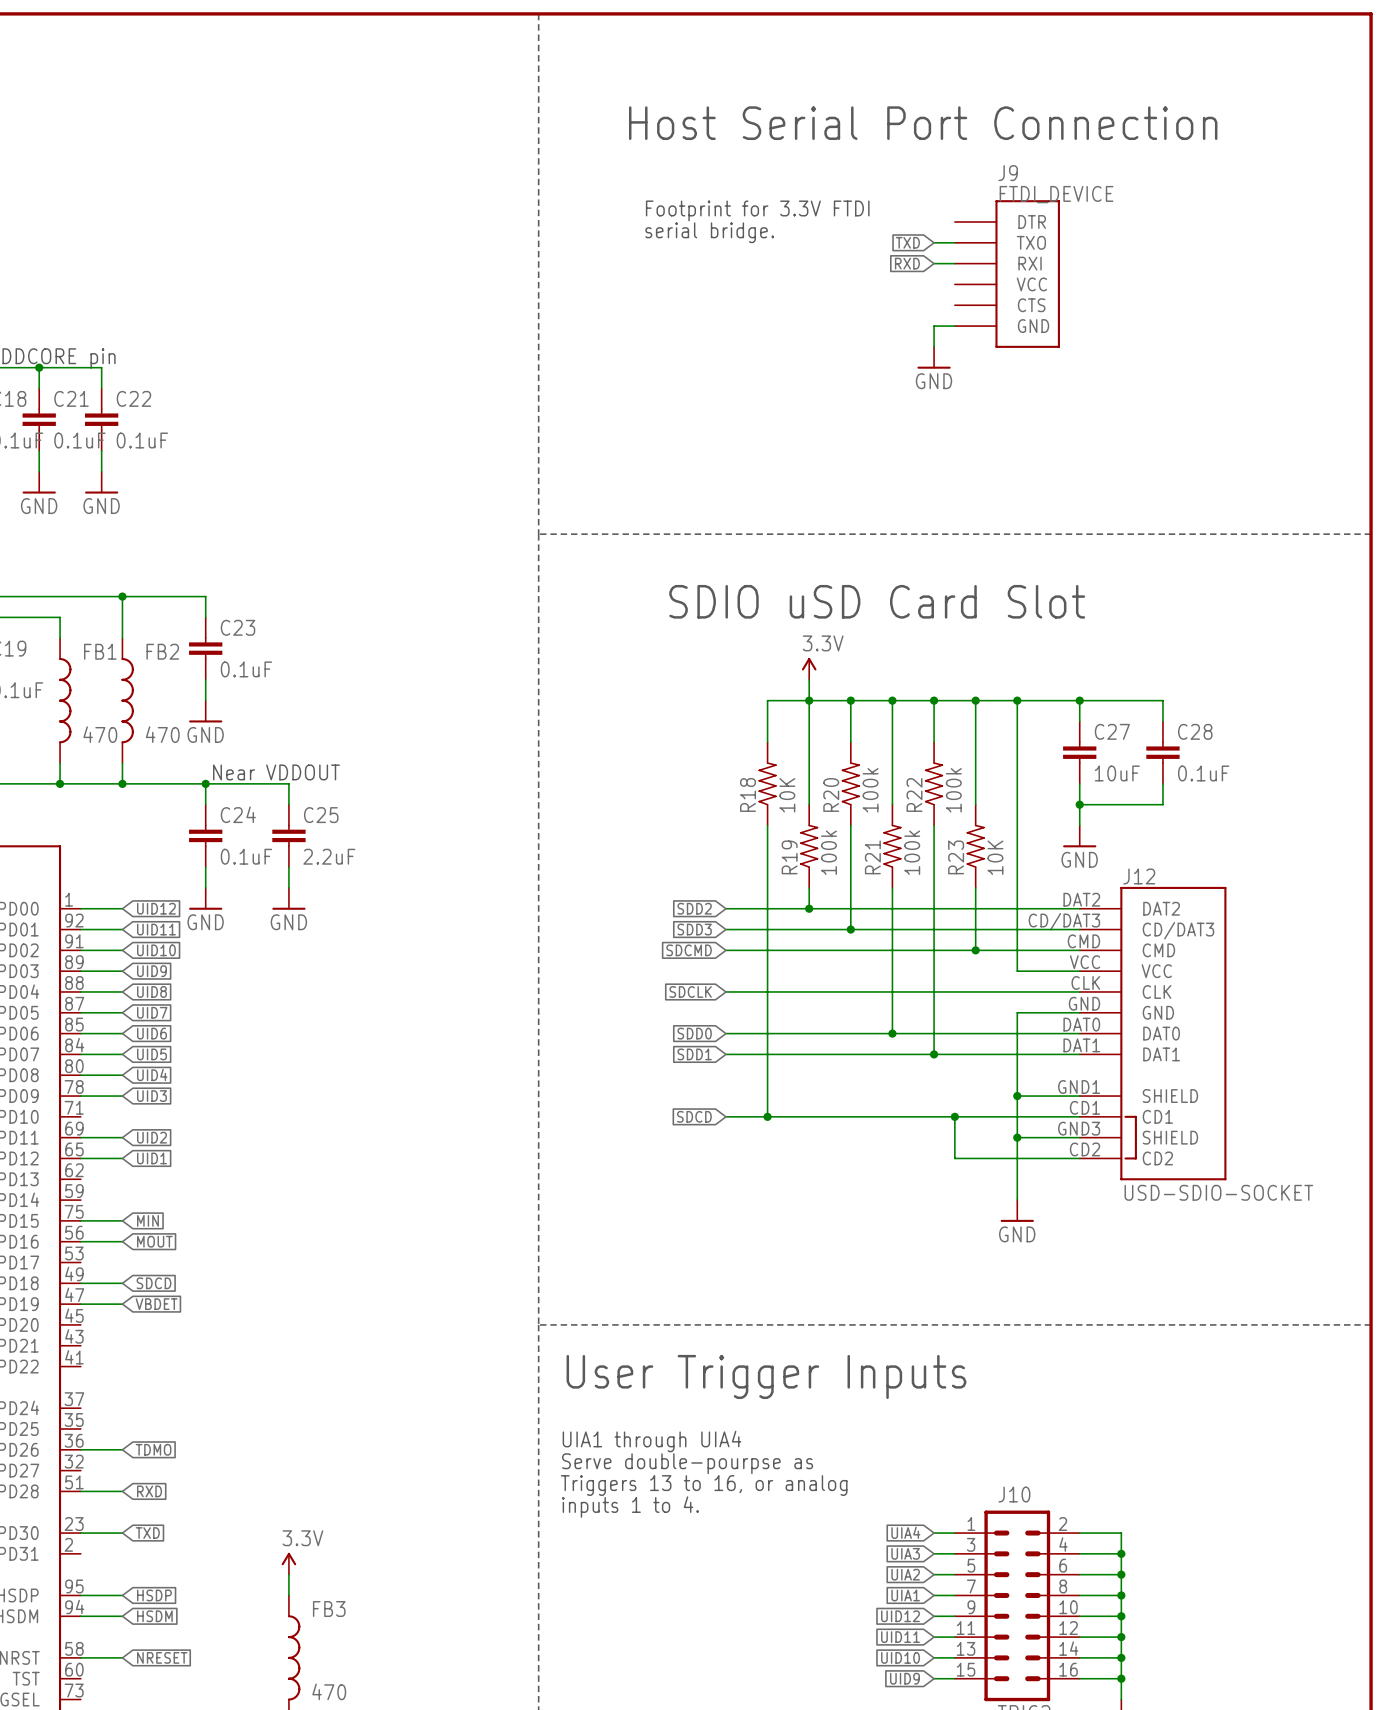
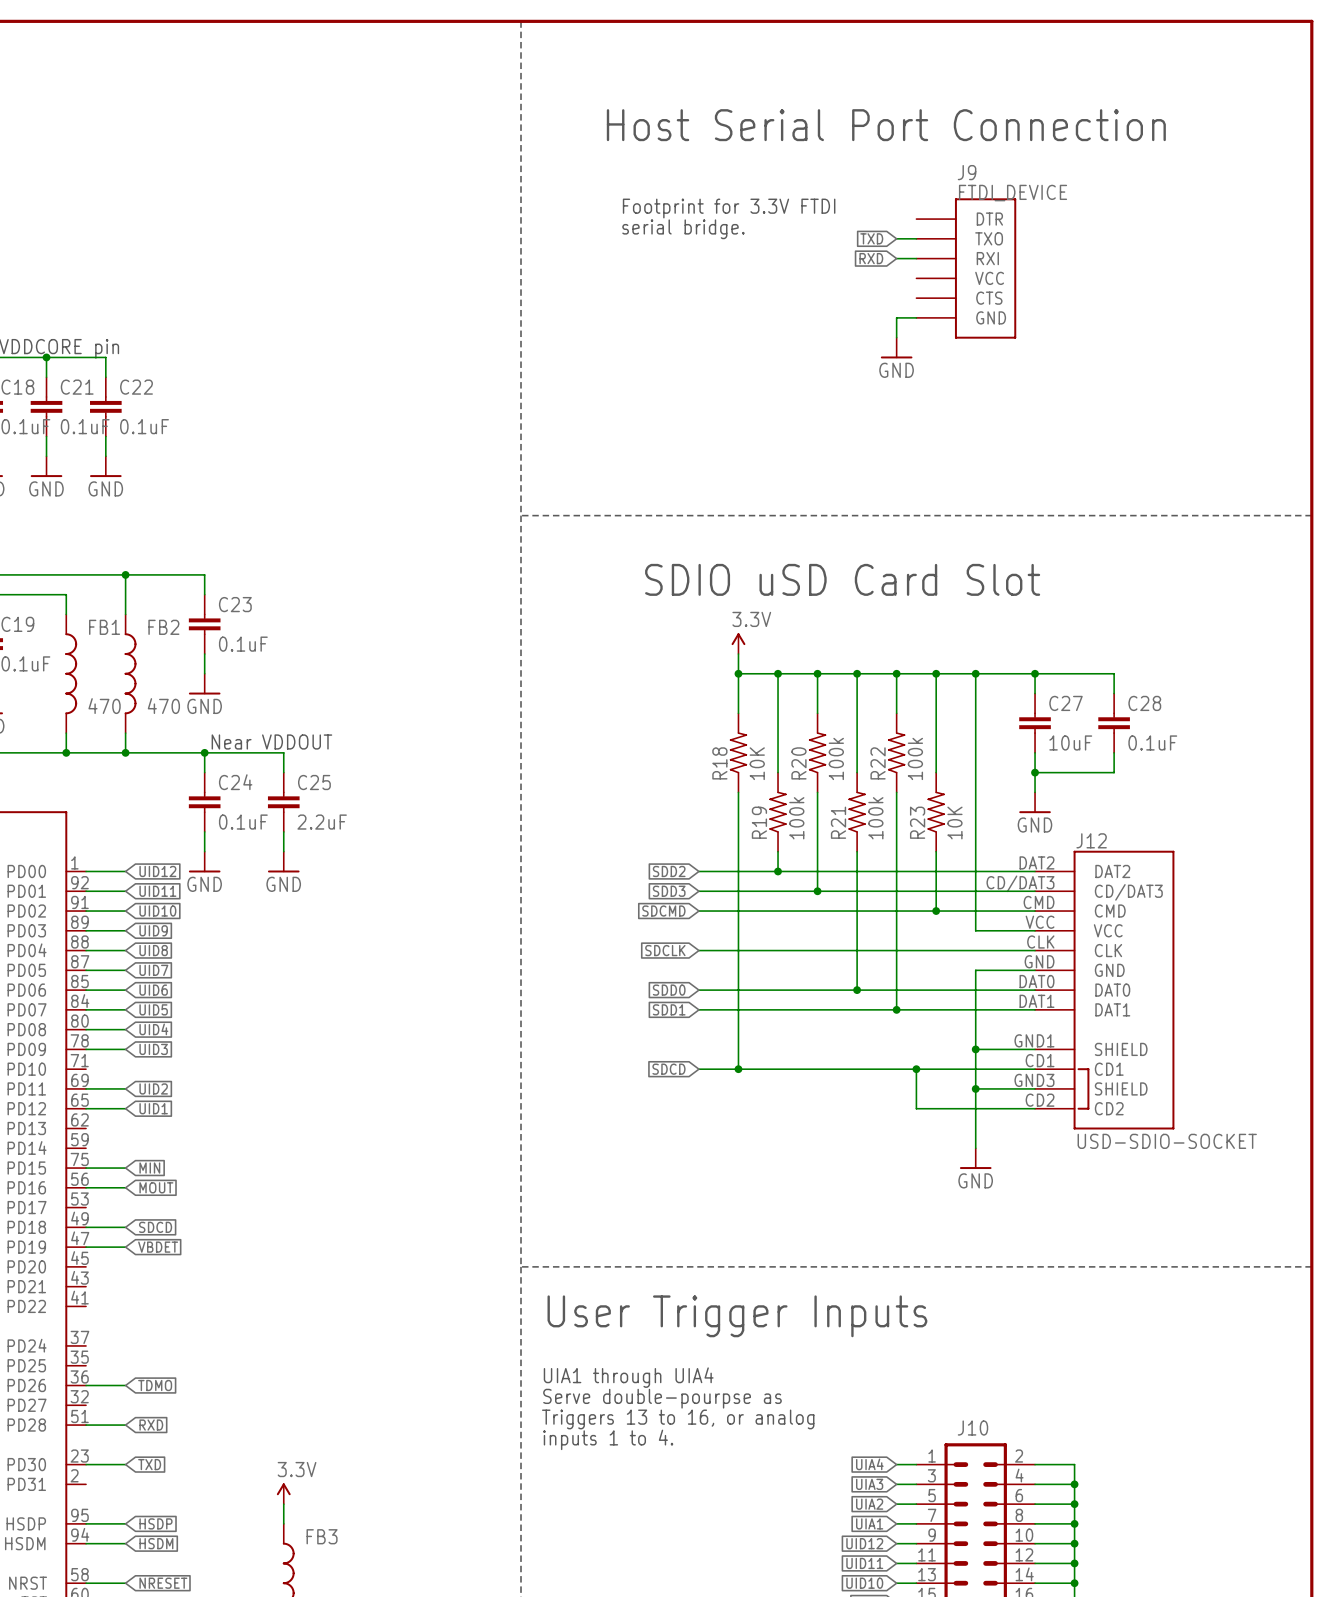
power symbol position: 3.3V (809, 668) -> 3.3V (738, 643)
wire: (809, 679) (809, 700) -> (738, 654) (738, 673)
junction: none -> (738, 673)

